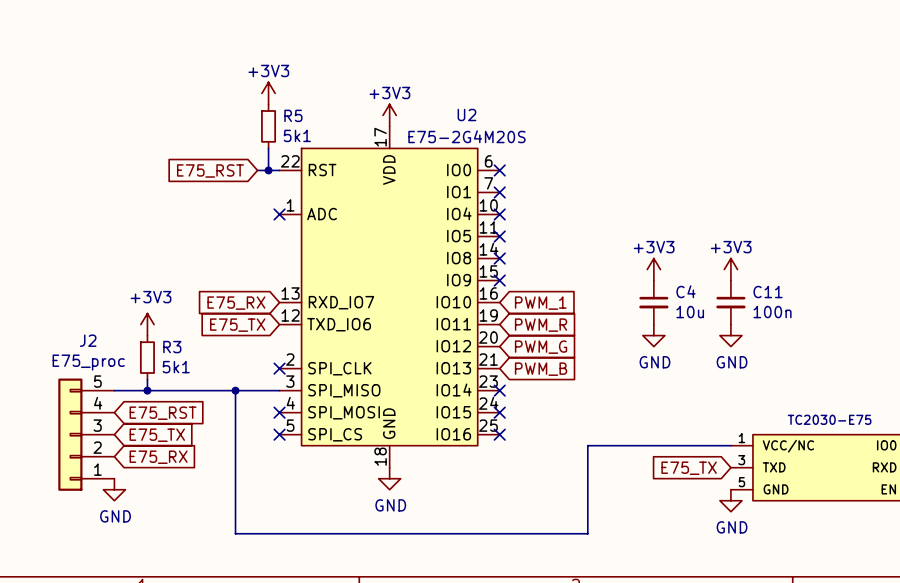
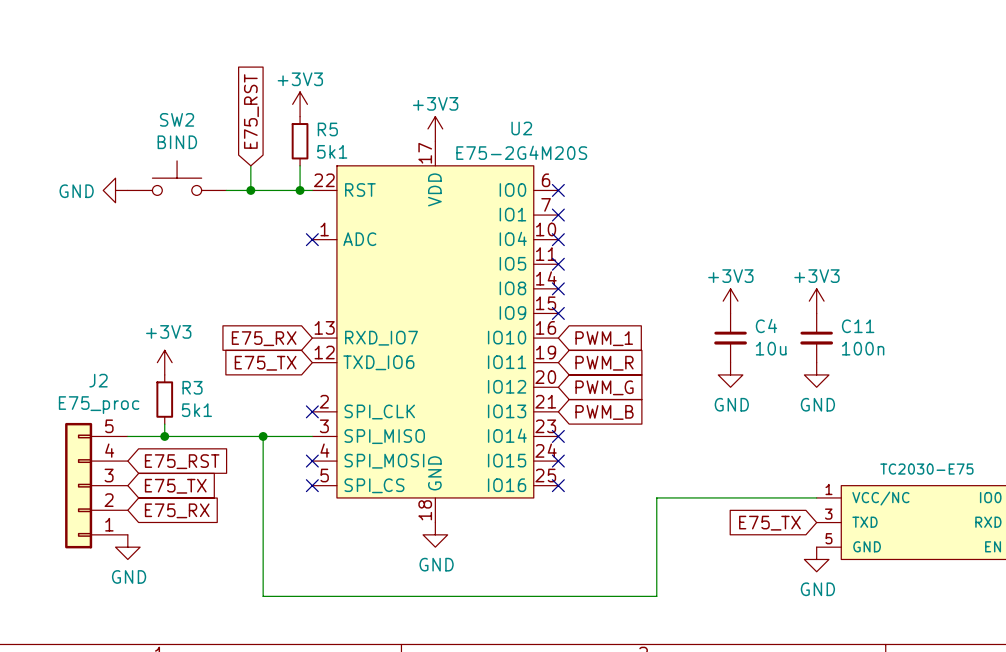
wire: none -> (250, 165) (250, 190)
SW2: none -> BIND (177, 178)
power symbol: none -> GND (115, 190)
wire: none -> (226, 190) (287, 190)
global label rotation: 0° (210, 170) -> 90° clockwise (251, 111)
junction: none -> (250, 190)

